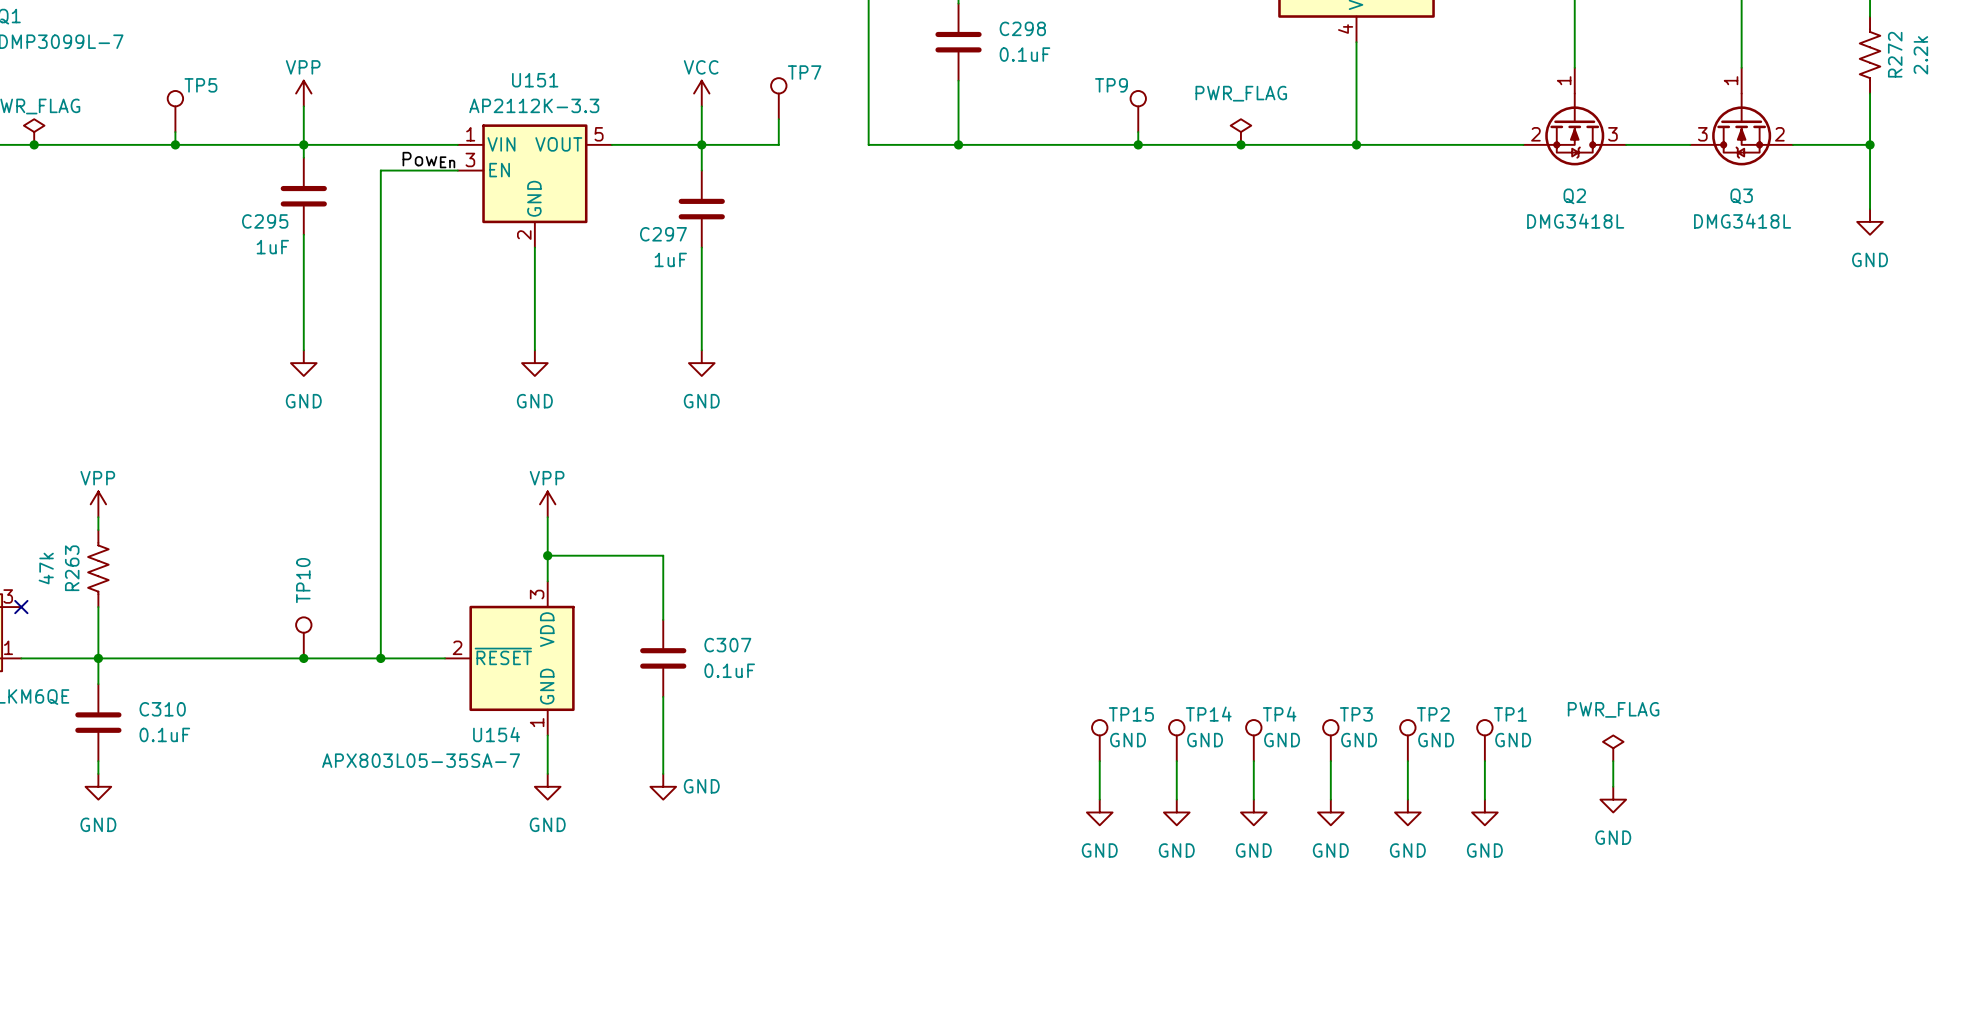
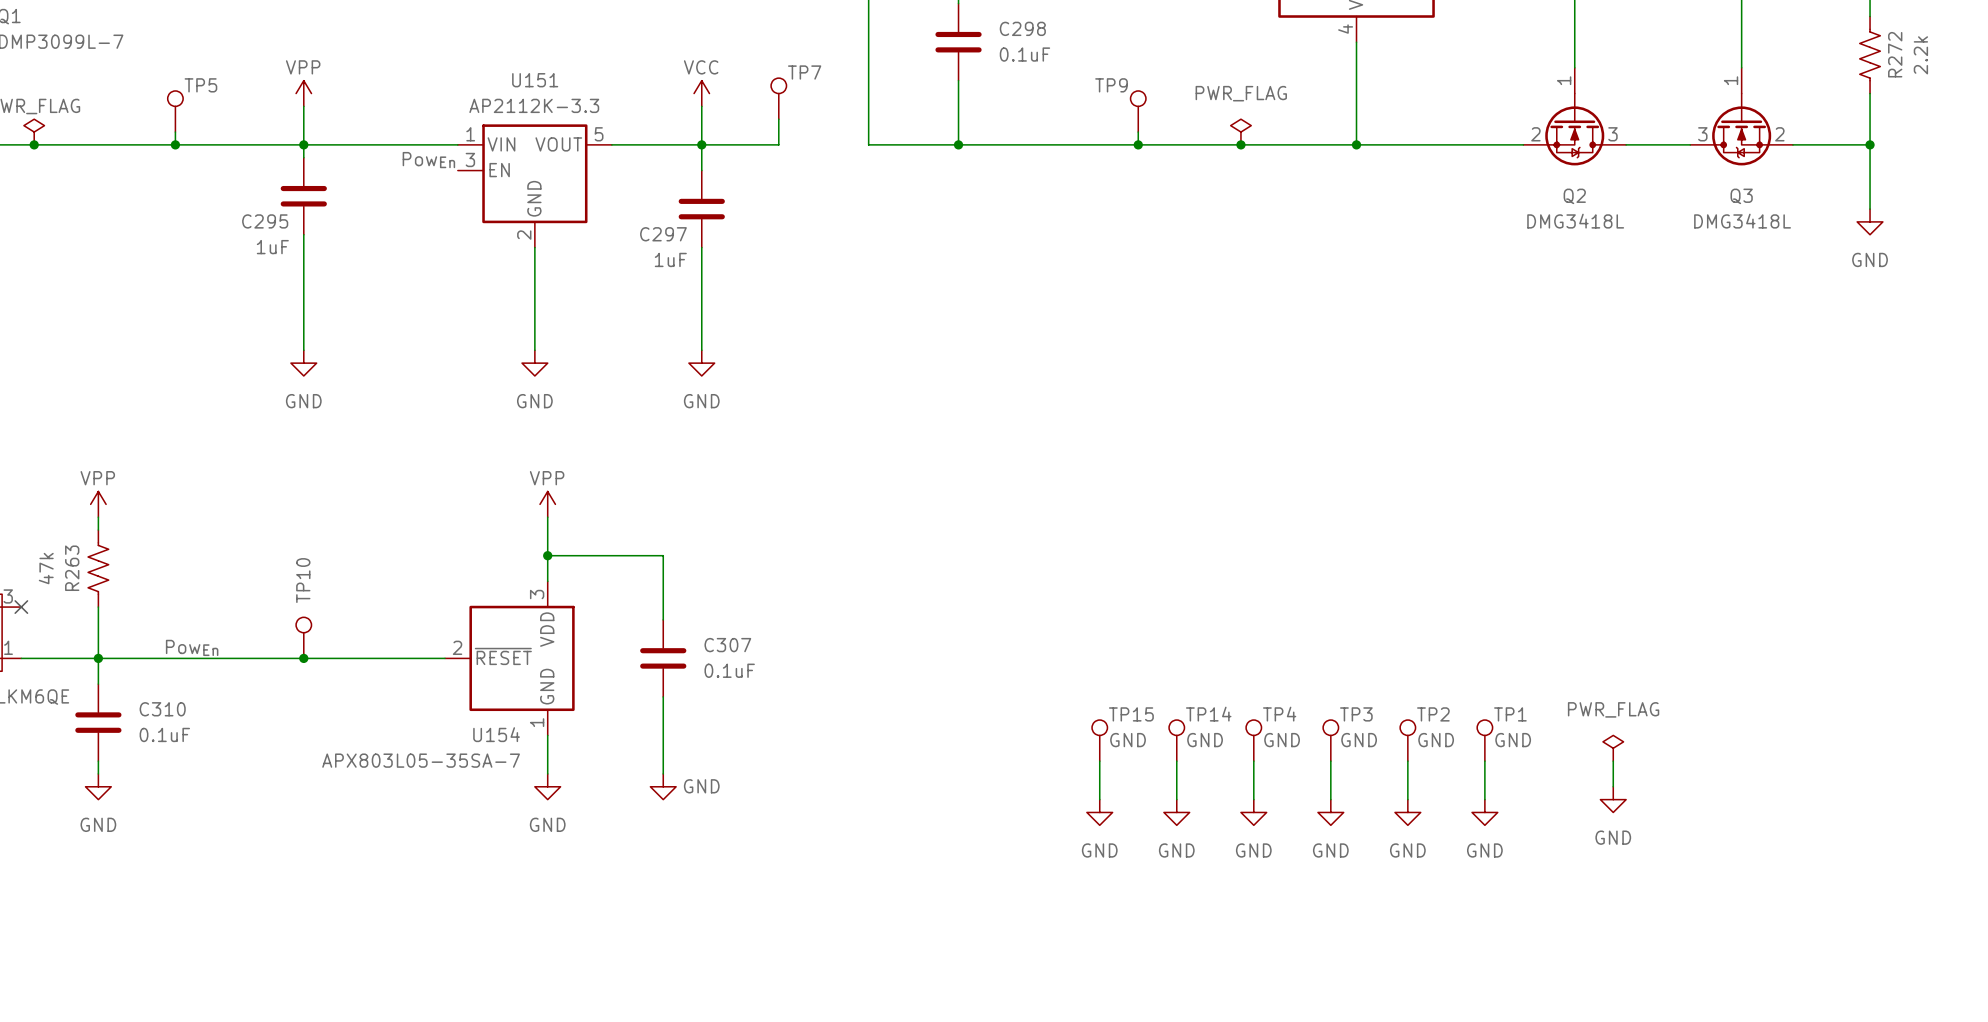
wire: (457, 170) (380, 170) (380, 658) -> none
label: none -> PowEn (192, 647)
junction: (380, 658) -> none

